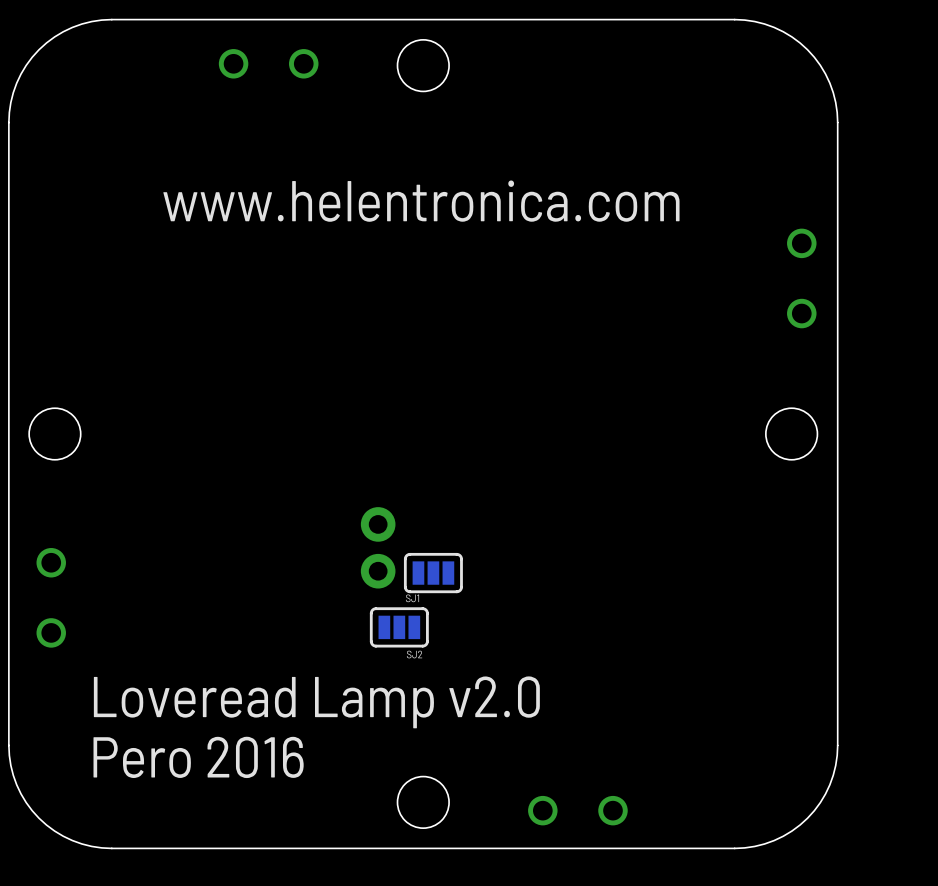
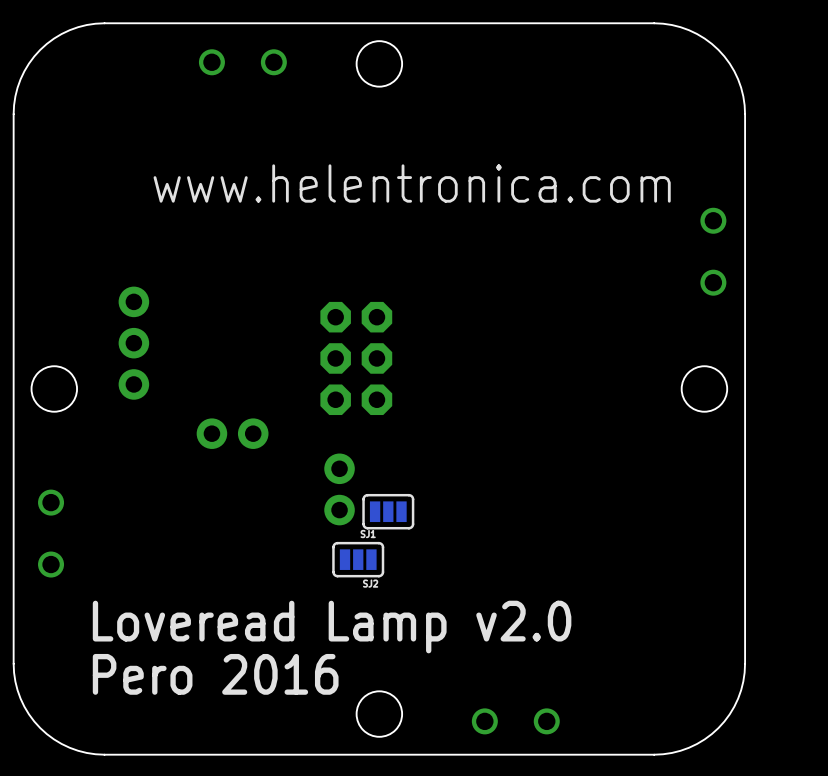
part: none -> (133, 343)
part: none -> (356, 358)
part: none -> (232, 433)

